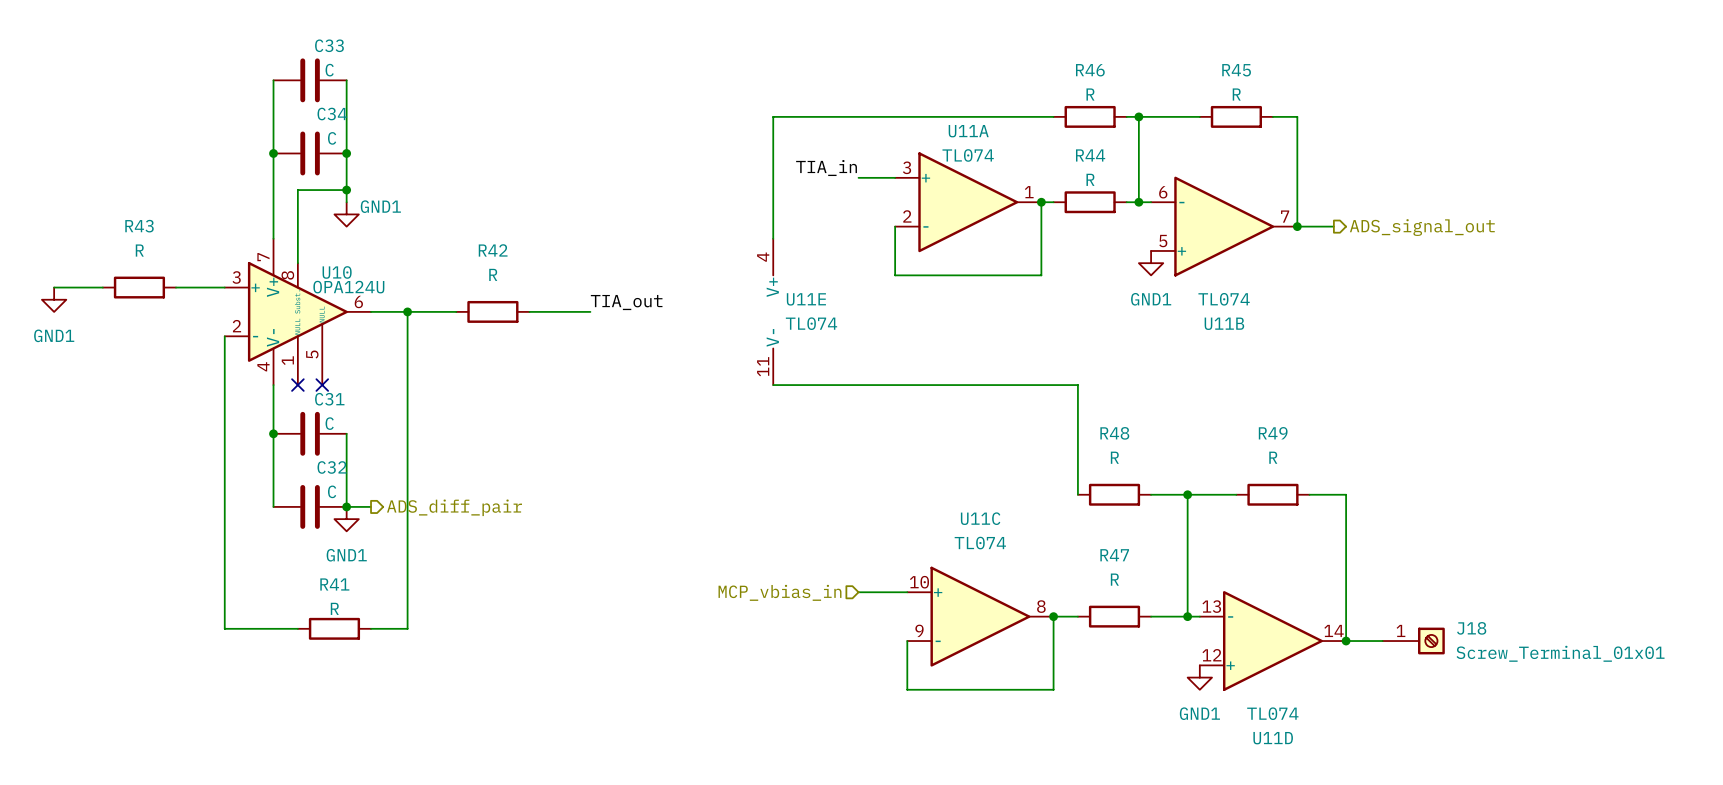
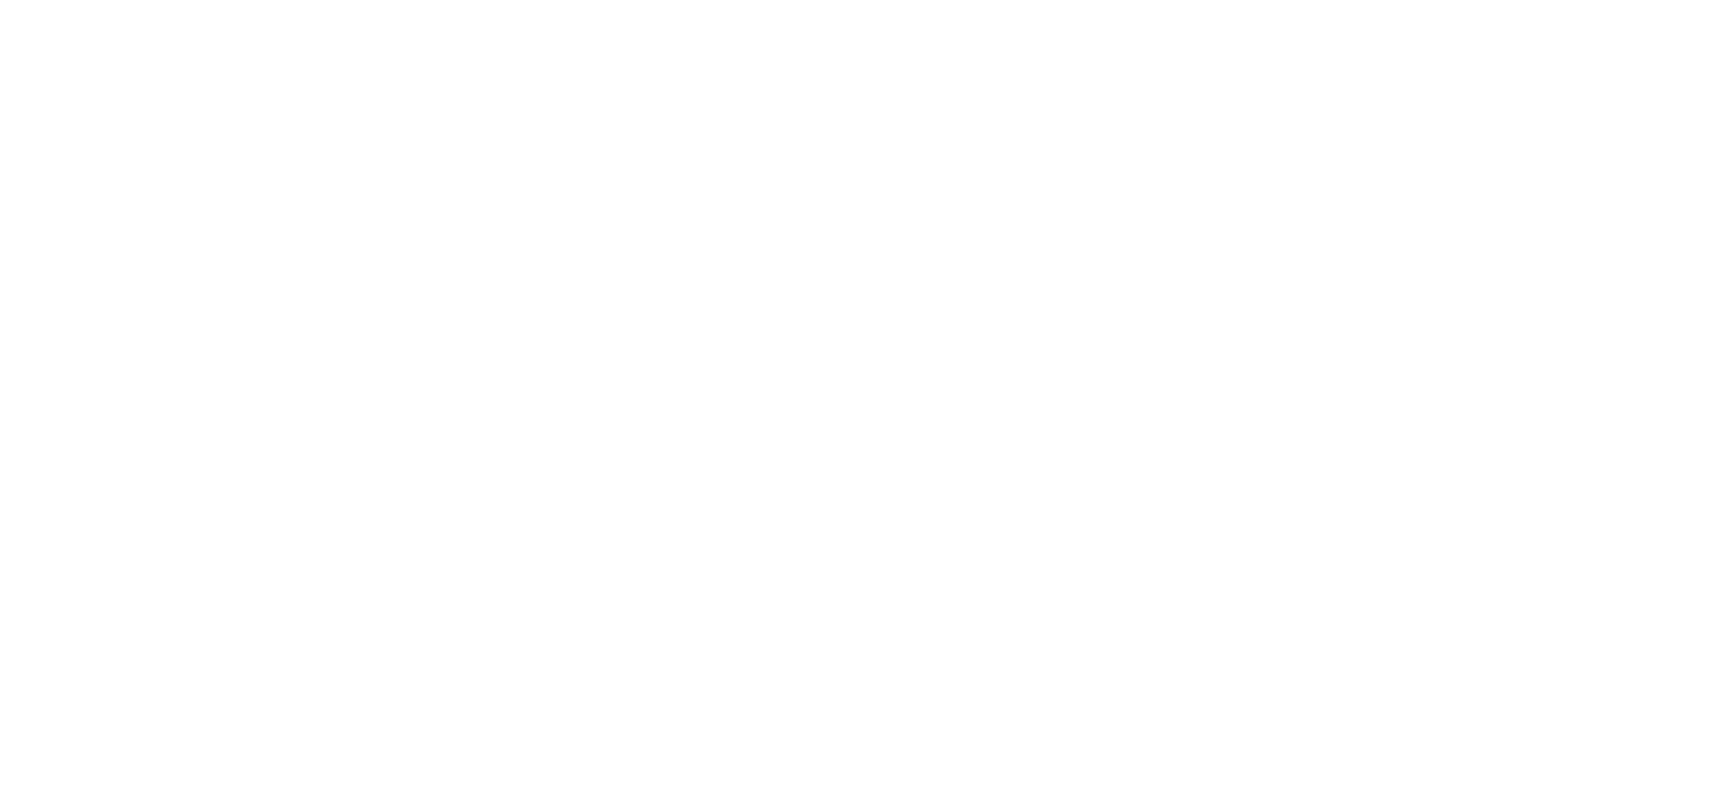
wire: (273, 80) (273, 238) -> none
C33: C (310, 80) -> none
wire: (346, 80) (346, 202) -> none
wire: (1053, 116) (773, 116) (773, 238) -> none
R46: R (1090, 116) -> none
wire: (1126, 116) (1199, 116) -> none
wire: (1138, 116) (1138, 202) -> none
junction: (1138, 116) -> none
R45: R (1236, 116) -> none
wire: (1272, 116) (1297, 116) (1297, 226) (1333, 226) -> none
junction: (273, 153) -> none
C34: C (310, 153) -> none
junction: (346, 153) -> none
label: TIA_in (826, 168) -> none
wire: (858, 177) (895, 177) -> none
wire: (346, 190) (297, 190) (297, 263) -> none
junction: (346, 190) -> none
U11A: TL074 (968, 202) -> none
junction: (1041, 202) -> none
wire: (1053, 202) (1041, 202) (1041, 275) (895, 275) (895, 226) -> none
R44: R (1090, 202) -> none
wire: (1126, 202) (1151, 202) -> none
junction: (1138, 202) -> none
power symbol: GND1 (346, 214) -> none
U11B: TL074 (1224, 226) -> none
junction: (1297, 226) -> none
hierarchical label: ADS_signal_out (1422, 227) -> none
power symbol: GND1 (1151, 263) -> none
wire: (54, 287) (102, 287) -> none
R43: R (139, 287) -> none
wire: (176, 287) (224, 287) -> none
power symbol: GND1 (54, 299) -> none
label: TIA_out (626, 302) -> none
U10: OPA124U (297, 311) -> none
wire: (371, 311) (456, 311) -> none
wire: (407, 311) (407, 628) (371, 628) -> none
junction: (407, 311) -> none
R42: R (492, 311) -> none
wire: (529, 311) (590, 311) -> none
U11E: TL074 (773, 311) -> none
wire: (224, 336) (224, 628) (297, 628) -> none
wire: (273, 385) (273, 506) -> none
no-connect mark: (297, 385) -> none
no-connect mark: (322, 385) -> none
wire: (773, 385) (1077, 385) (1077, 494) -> none
junction: (273, 433) -> none
C31: C (310, 433) -> none
wire: (346, 433) (346, 506) (371, 506) -> none
R48: R (1114, 494) -> none
wire: (1151, 494) (1236, 494) -> none
wire: (1187, 494) (1187, 616) -> none
junction: (1187, 494) -> none
R49: R (1272, 494) -> none
wire: (1309, 494) (1346, 494) (1346, 641) (1382, 641) -> none
C32: C (310, 506) -> none
junction: (346, 506) -> none
hierarchical label: ADS_diff_pair (454, 507) -> none
power symbol: GND1 (346, 519) -> none
hierarchical label: MCP_vbias_in (780, 592) -> none
wire: (858, 592) (907, 592) -> none
U11C: TL074 (980, 616) -> none
junction: (1053, 616) -> none
wire: (1077, 616) (1053, 616) (1053, 689) (907, 689) (907, 641) -> none
R47: R (1114, 616) -> none
wire: (1151, 616) (1199, 616) -> none
junction: (1187, 616) -> none
R41: R (334, 628) -> none
U11D: TL074 (1272, 641) -> none
junction: (1346, 641) -> none
J18: Screw_Terminal_01x01 (1413, 641) -> none
power symbol: GND1 (1199, 677) -> none

